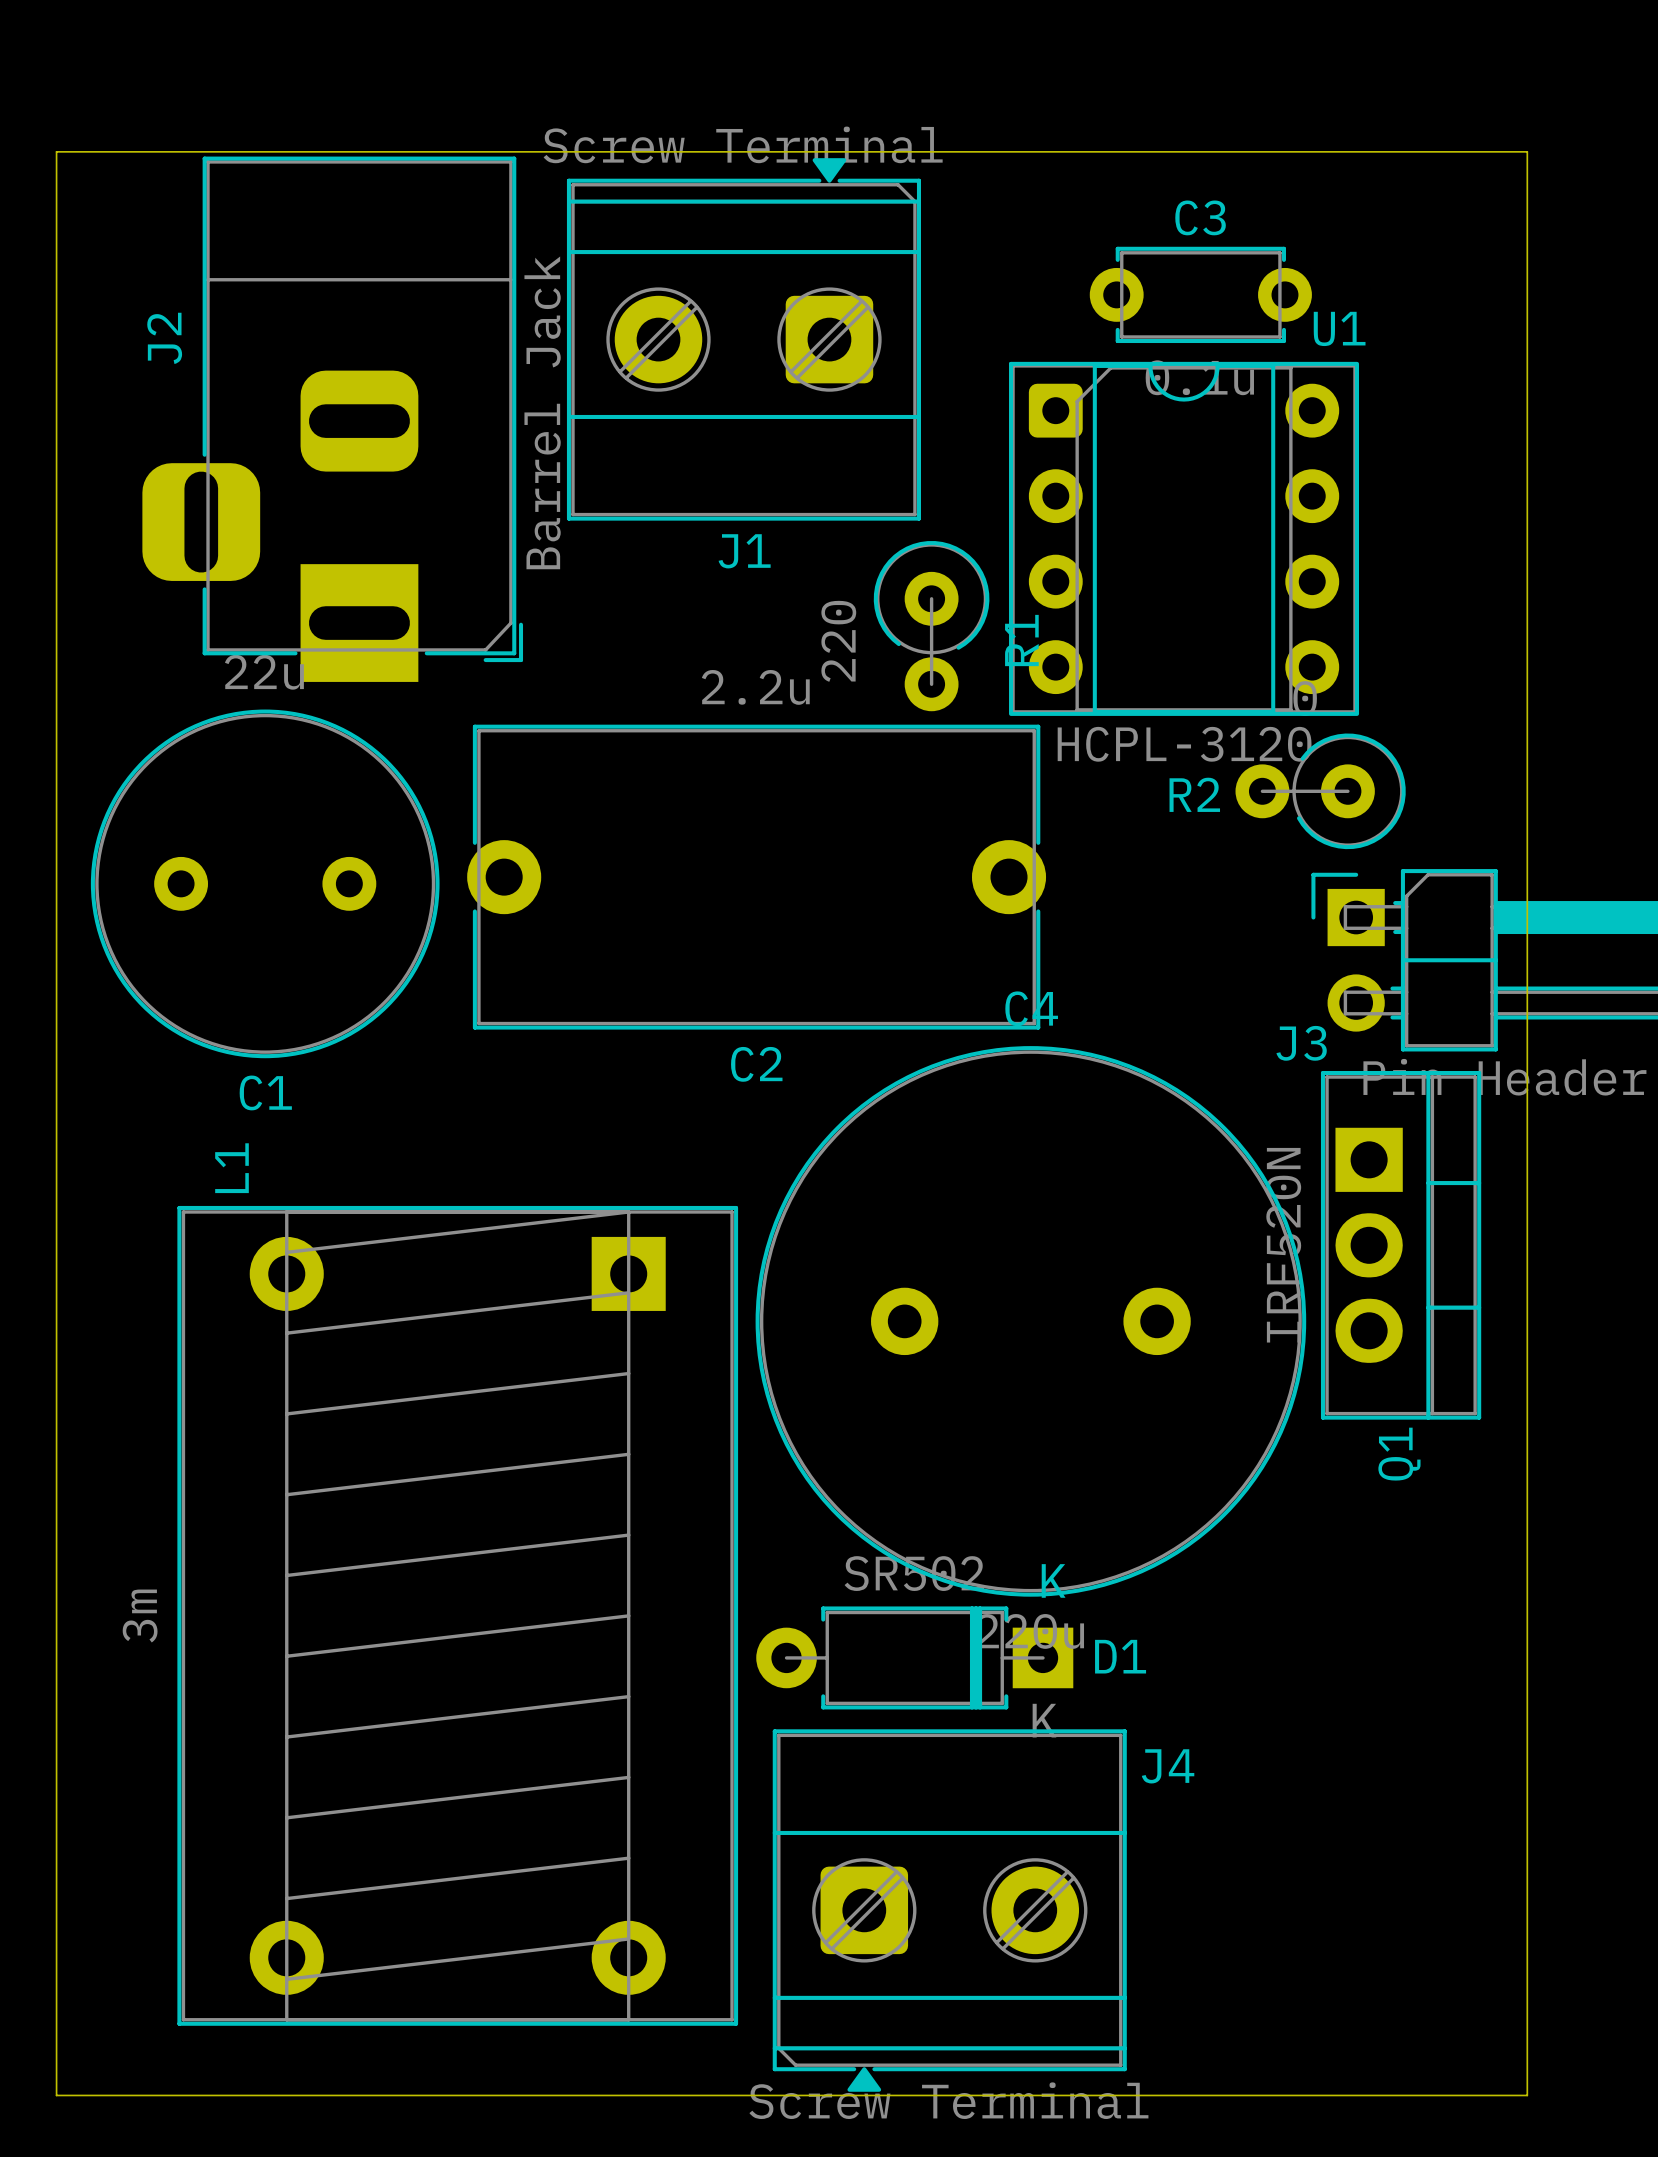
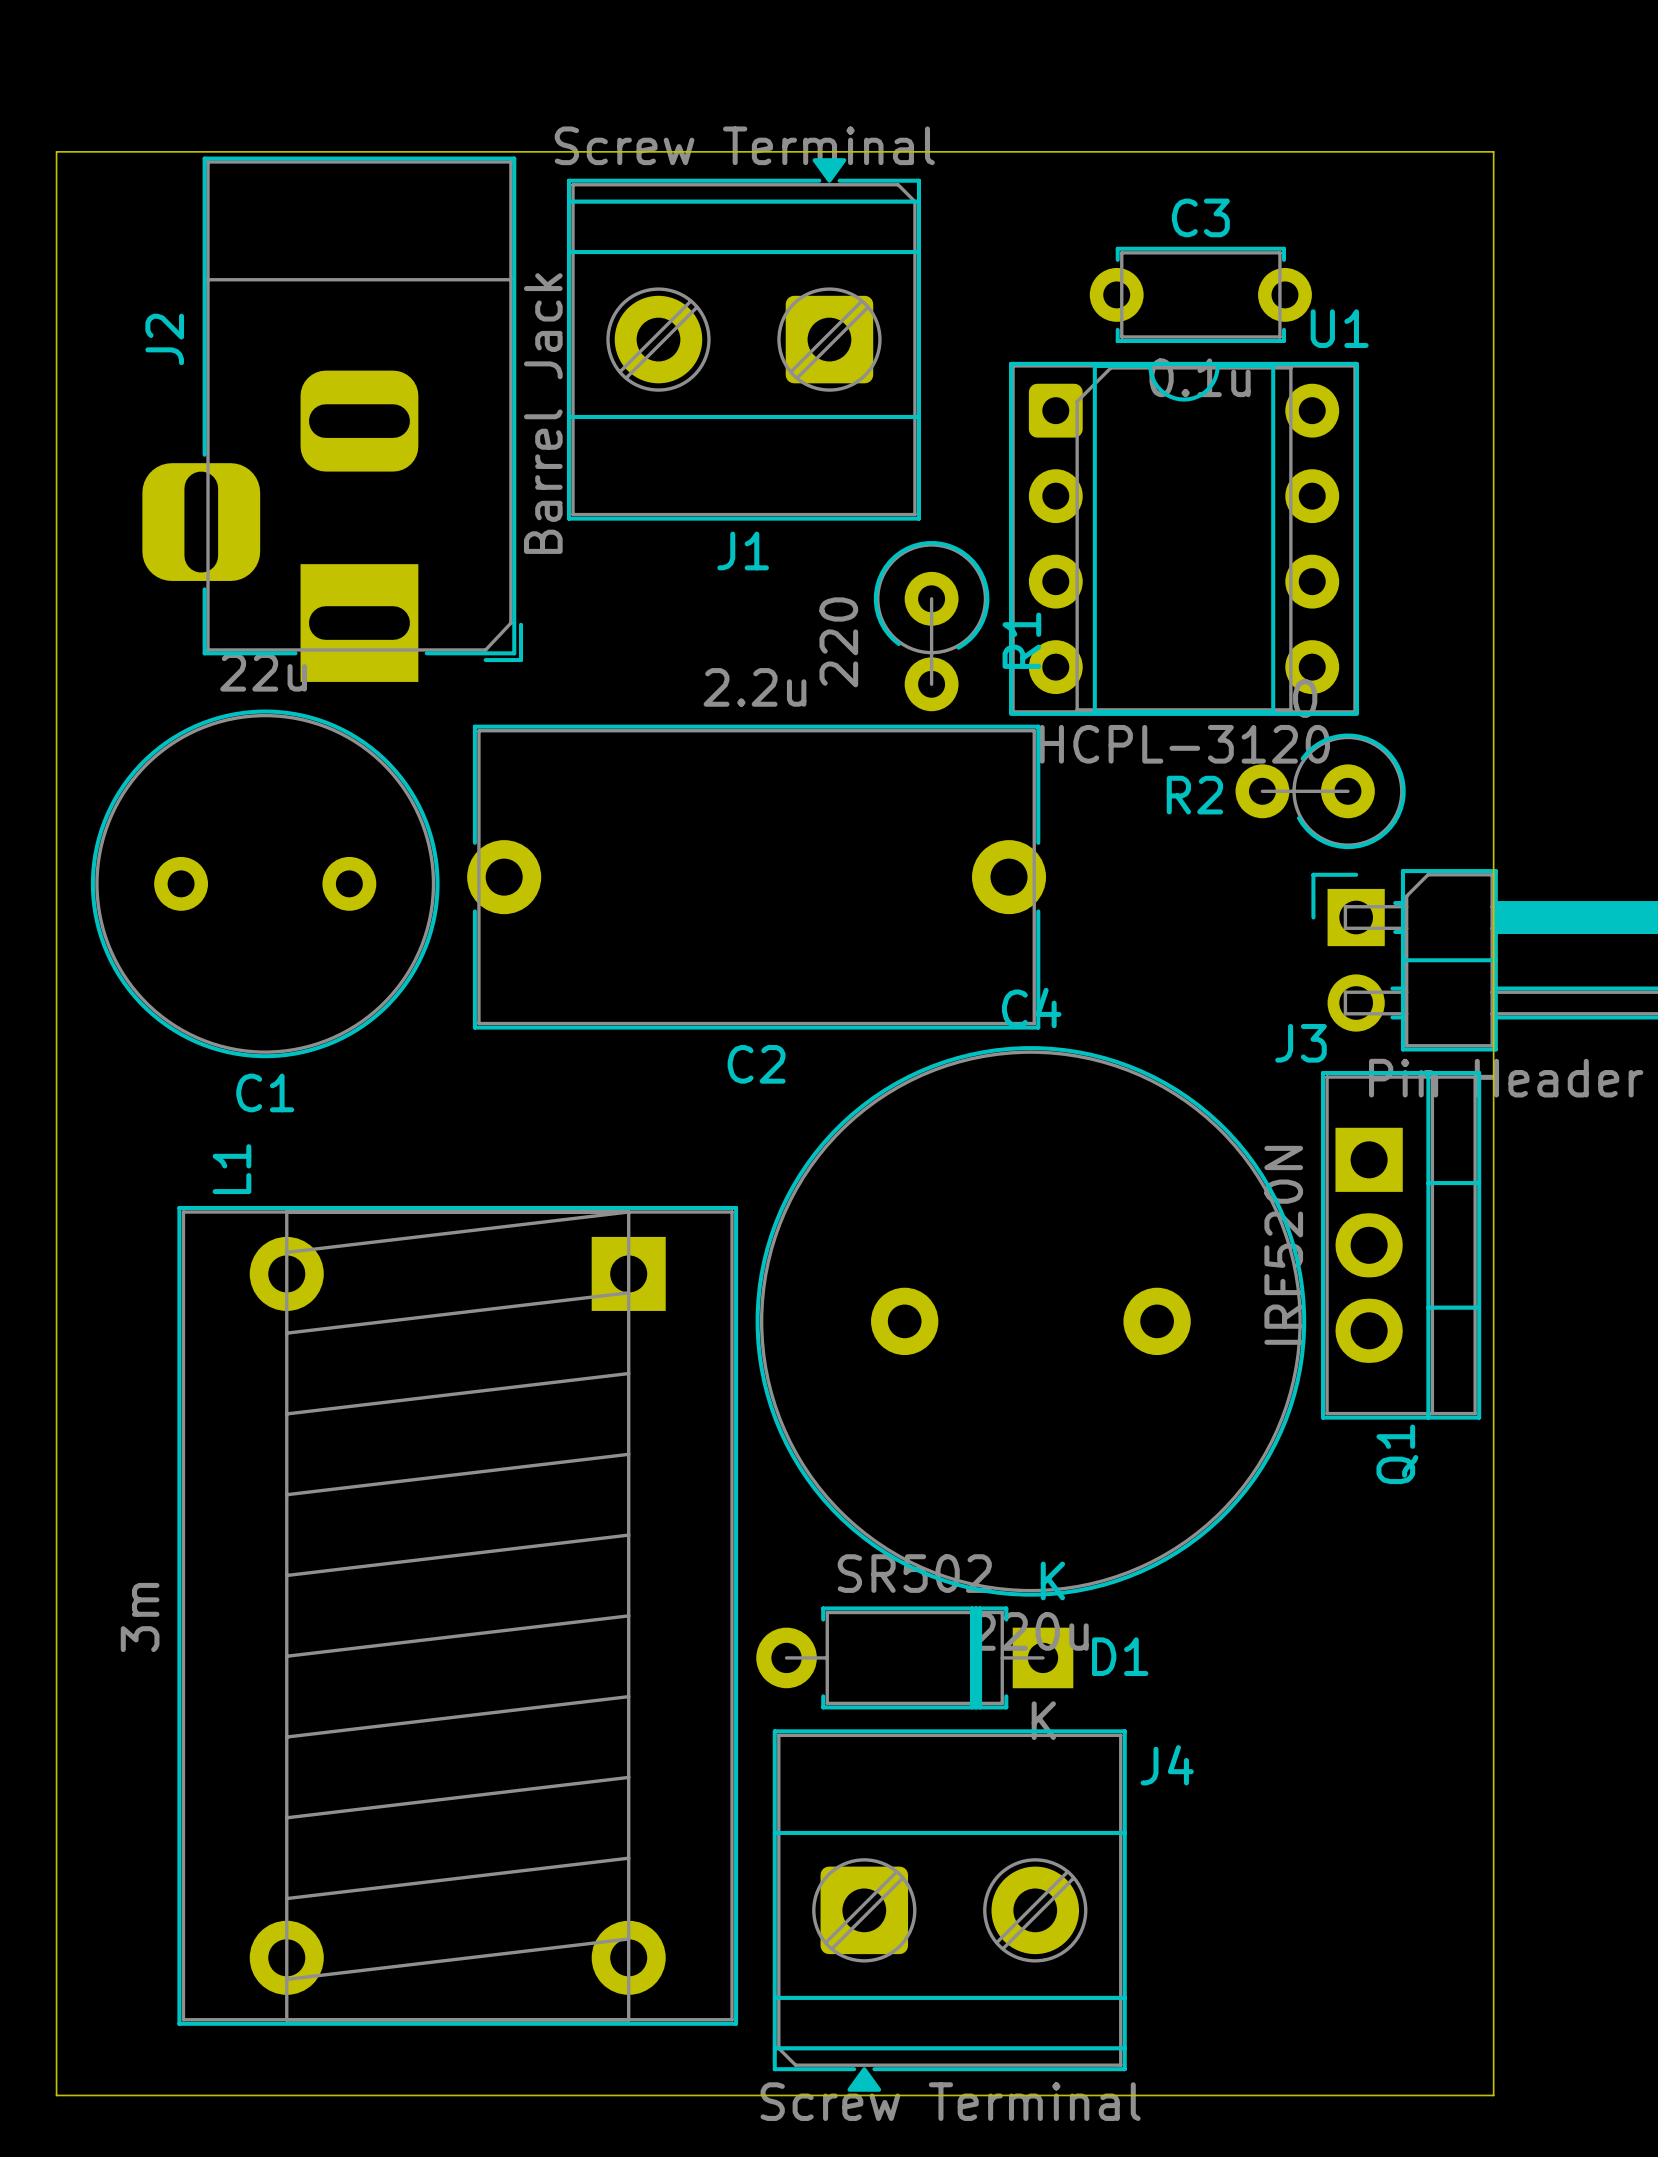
board edge: (1493, 151) (1527, 151) (1527, 2095) (1493, 2095) -> (1493, 151) (1493, 2095)

